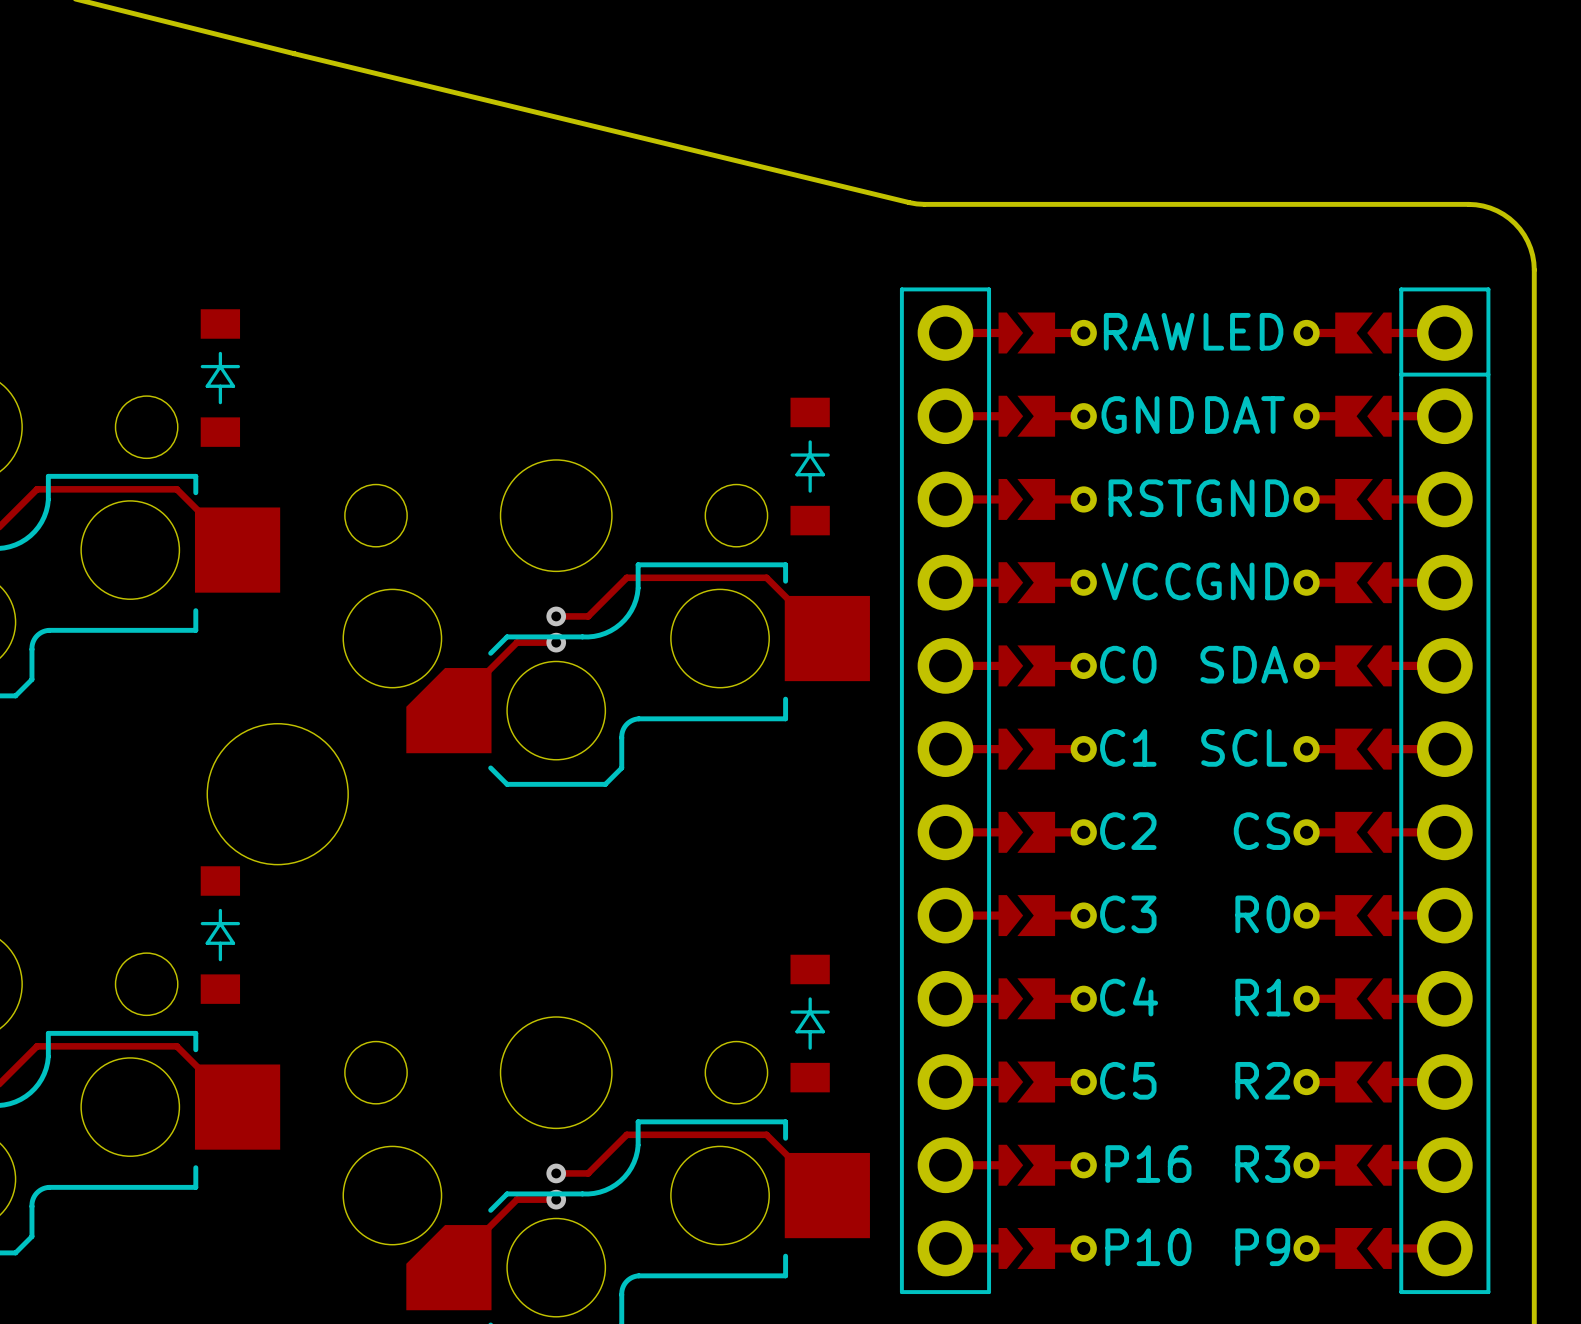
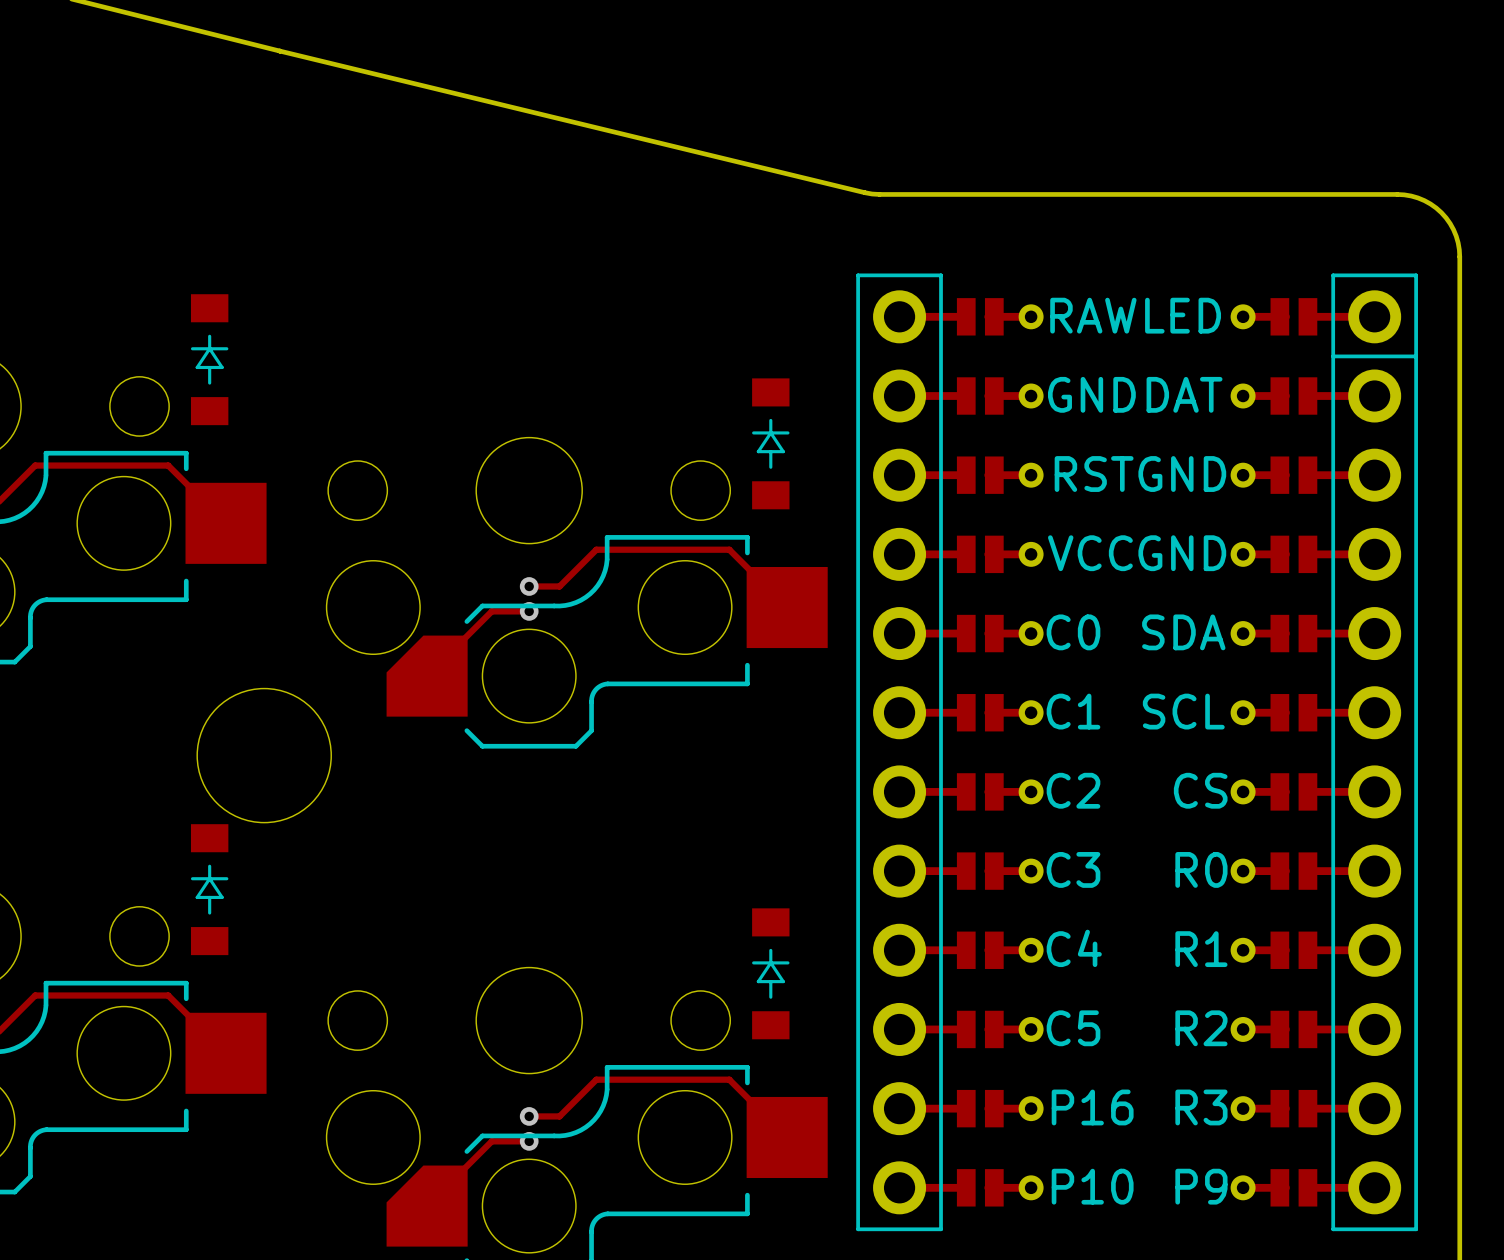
part footprint: [899, 287, 1491, 1295] -> [856, 273, 1418, 1232]

